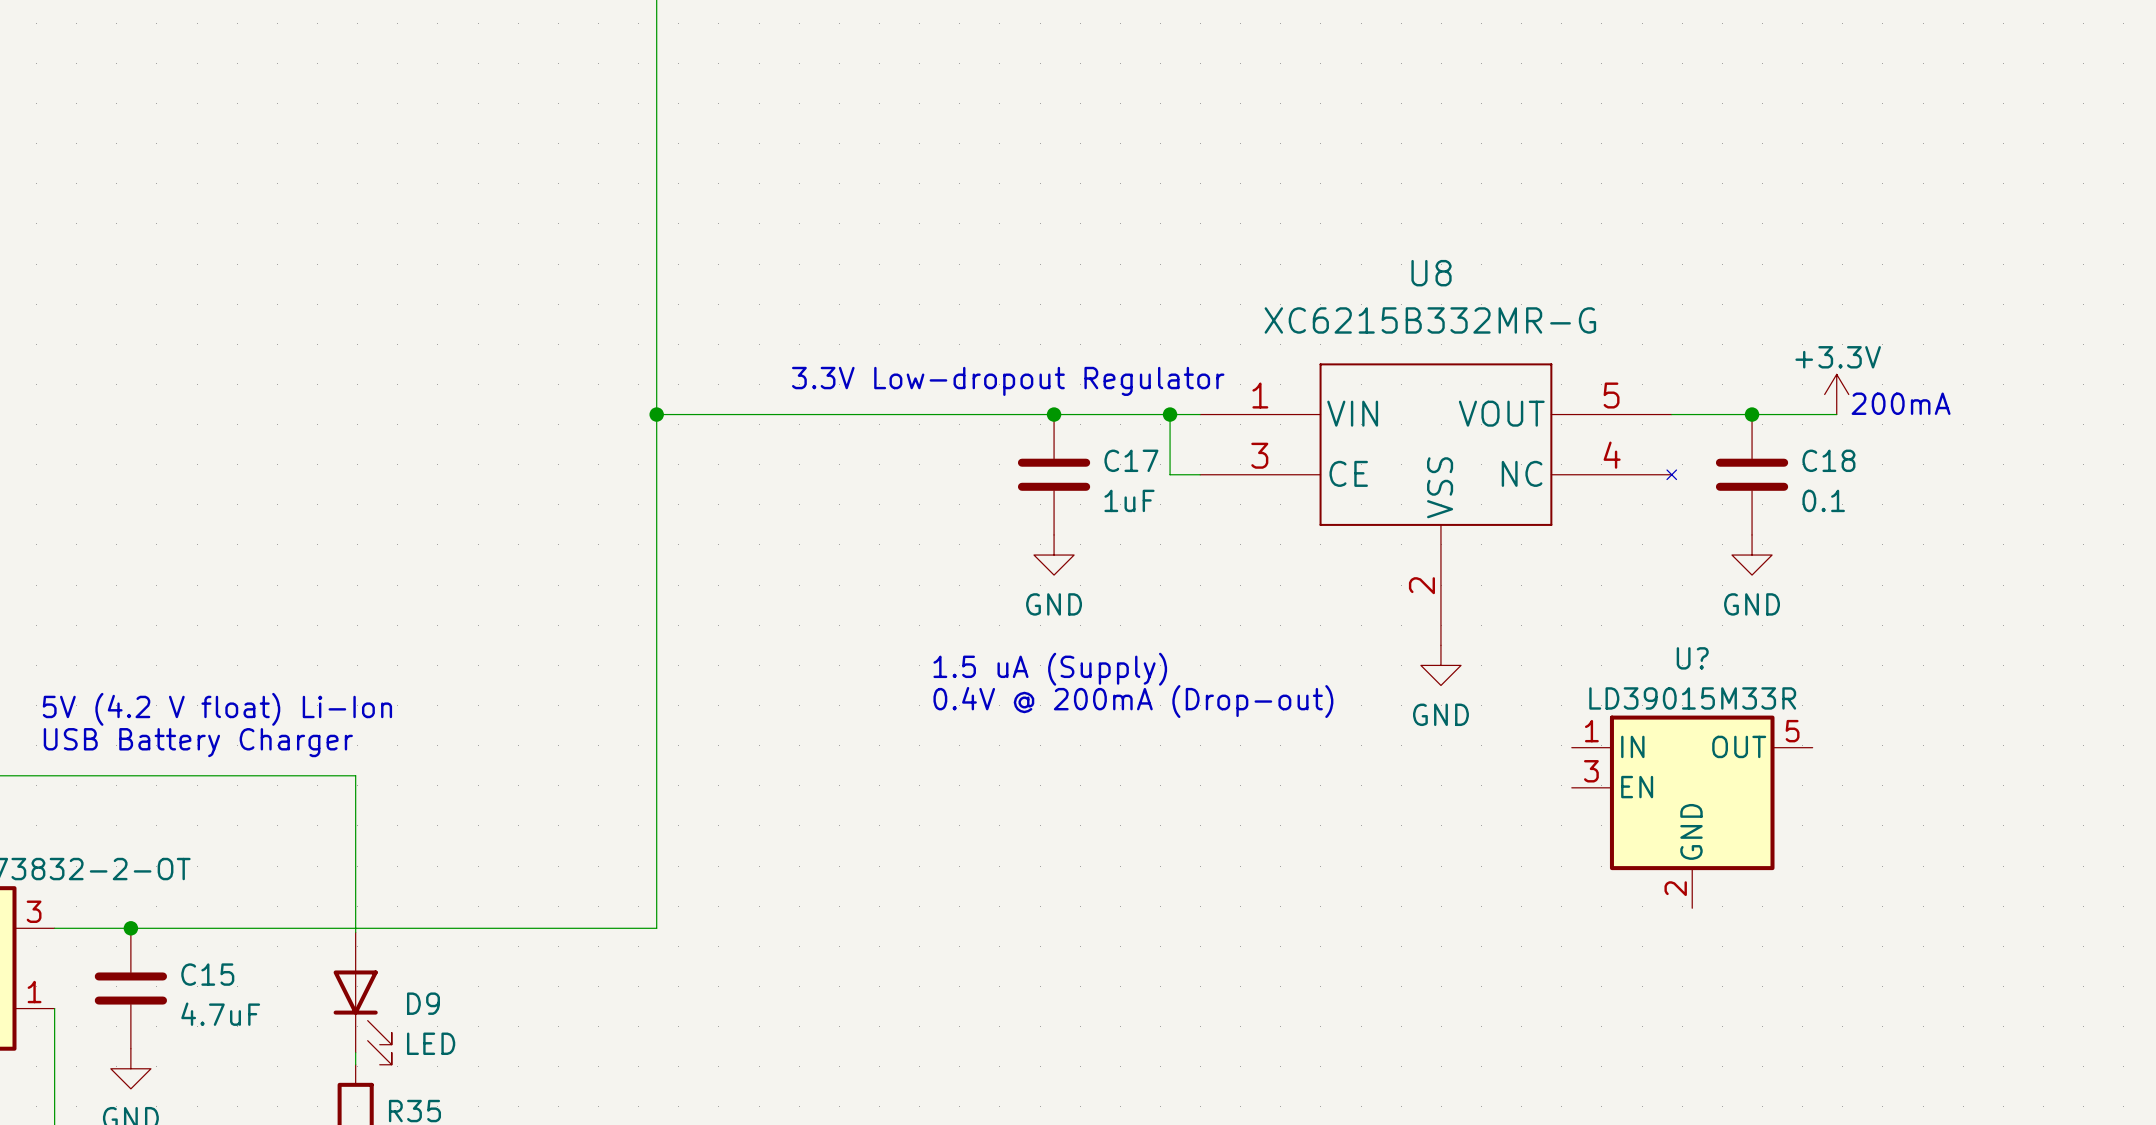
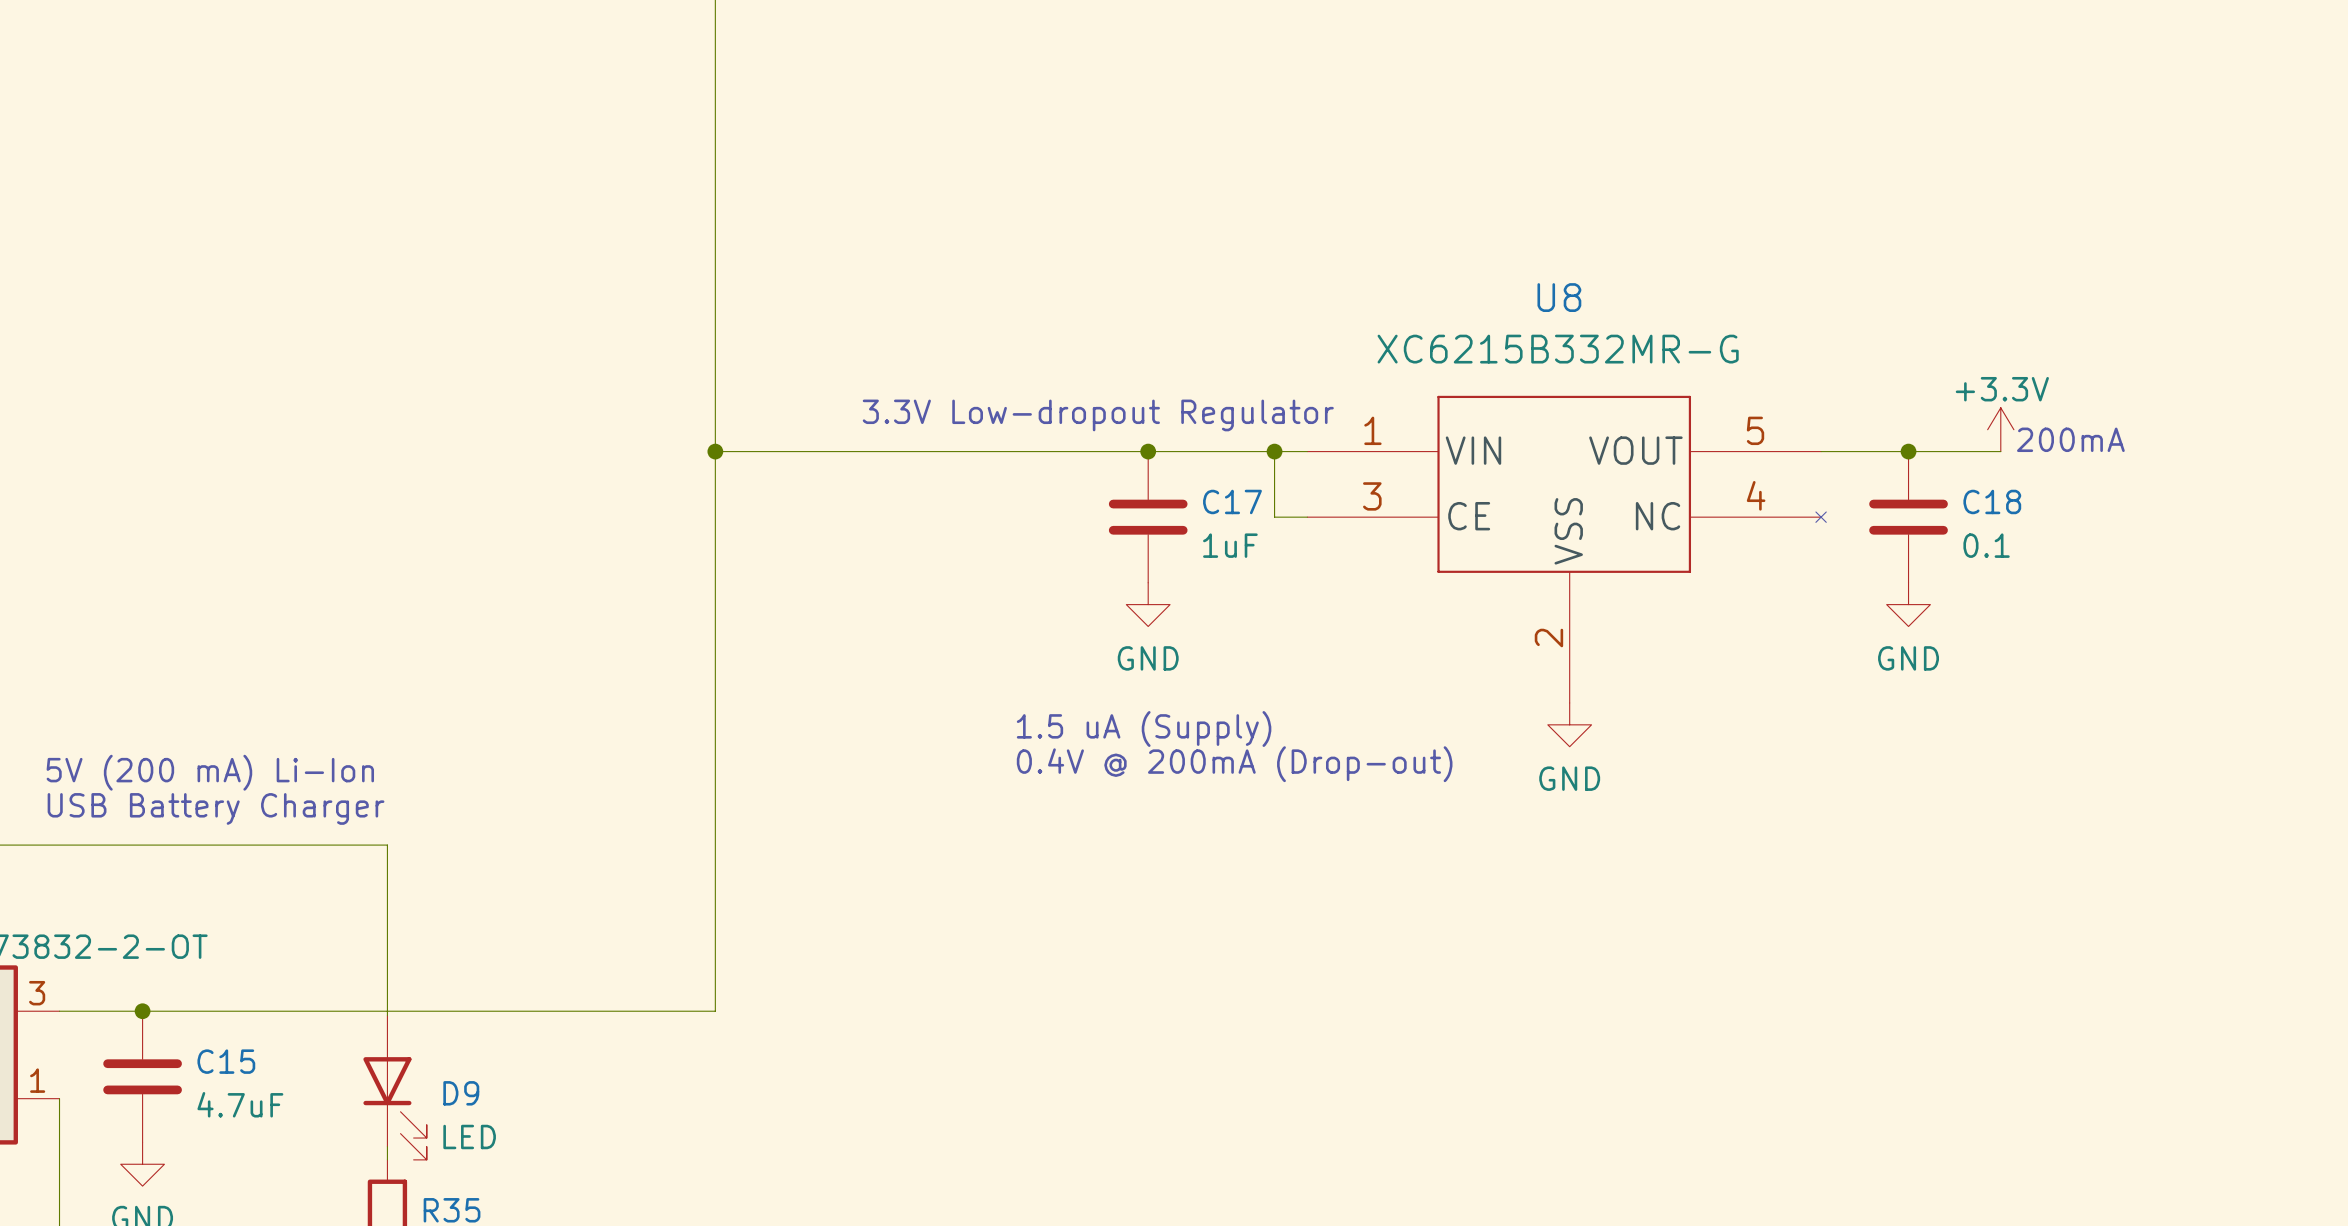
text: 5V (4.2 V float) Li-Ion (217, 709) -> 5V (200 mA) Li-Ion (210, 772)
U?: LD39015M33R (1692, 811) -> none

